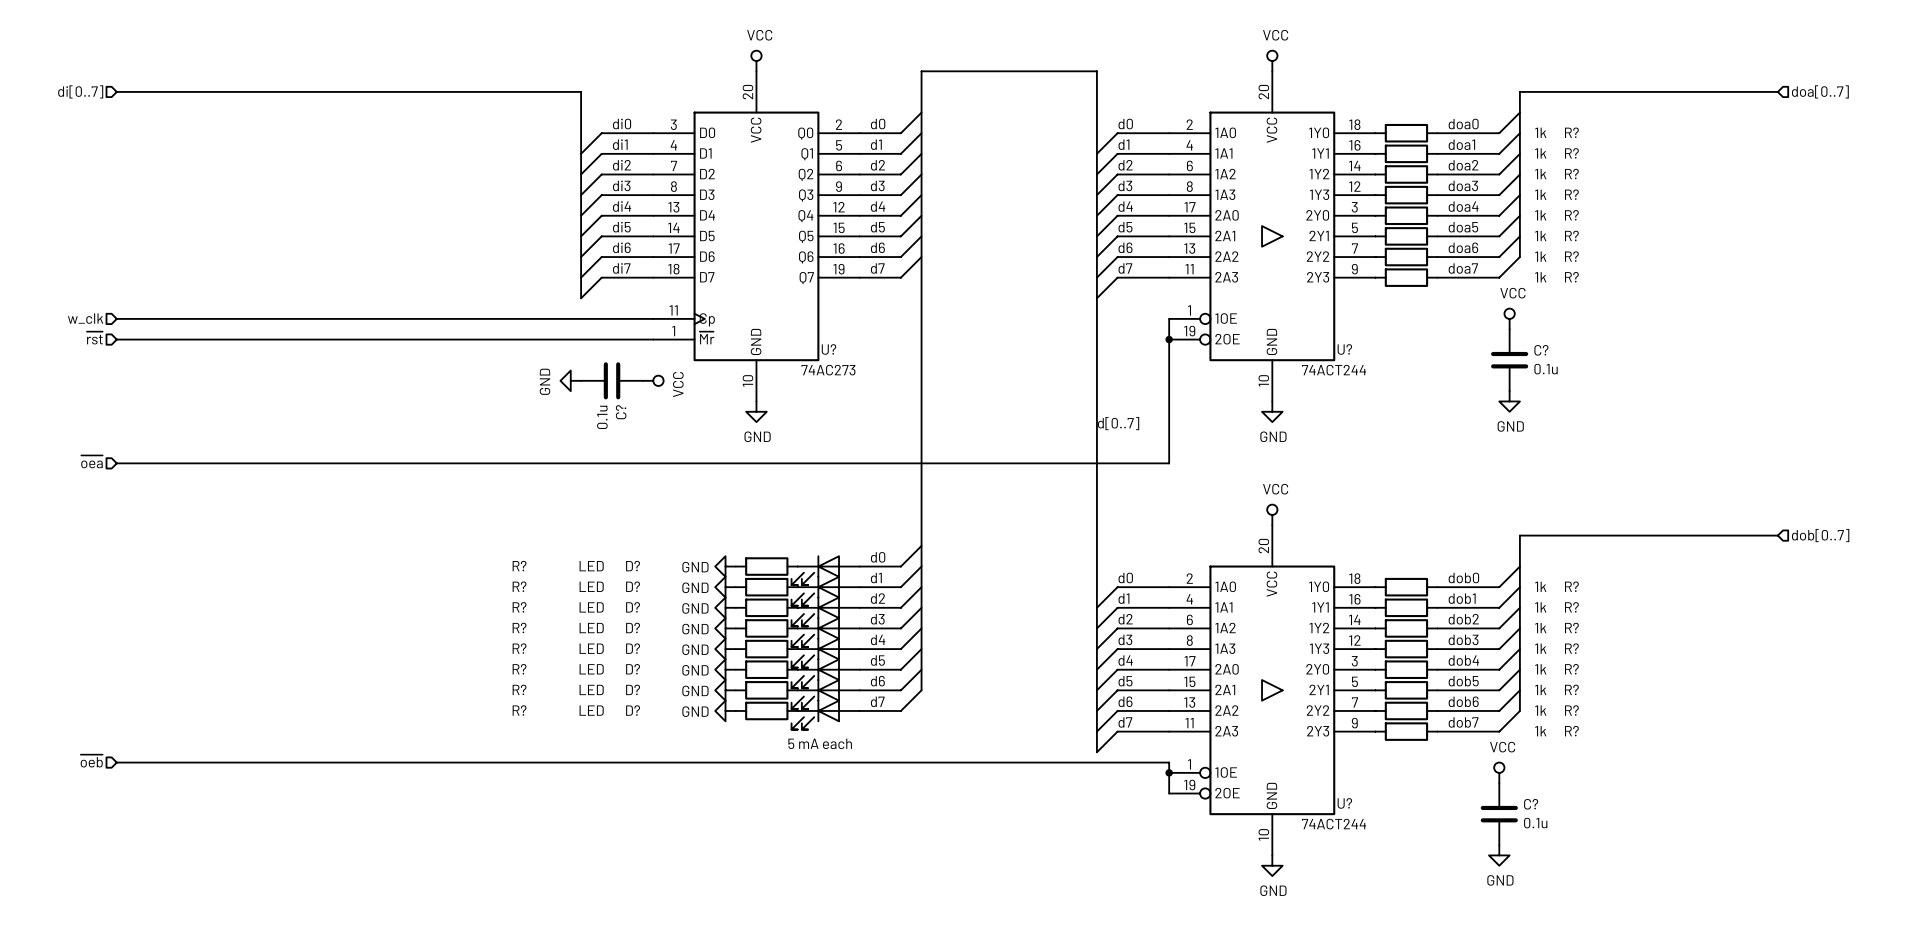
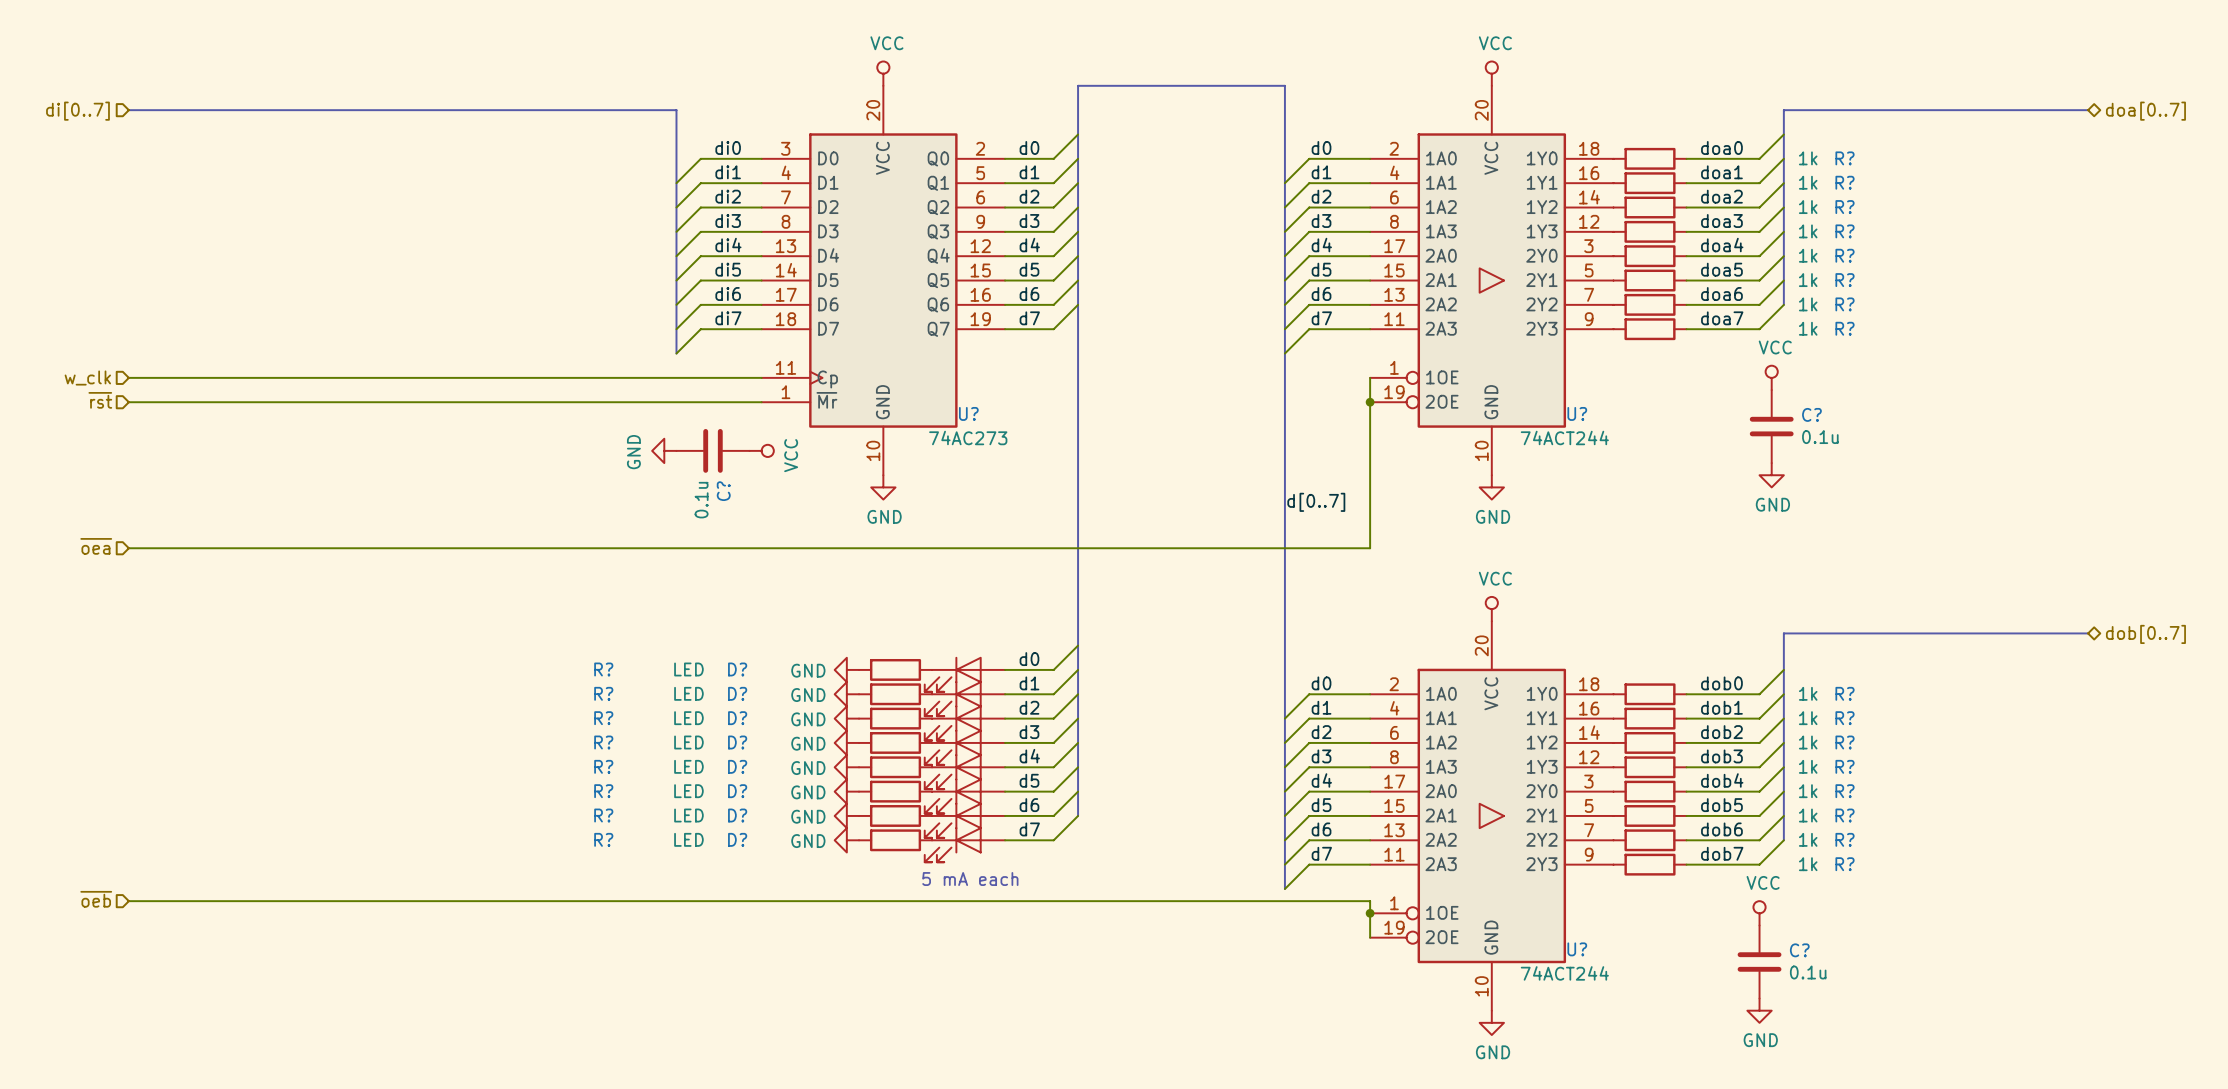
hierarchical label shape: input (1820, 91) -> bidirectional (2145, 111)
hierarchical label shape: input (1820, 535) -> bidirectional (2145, 634)

